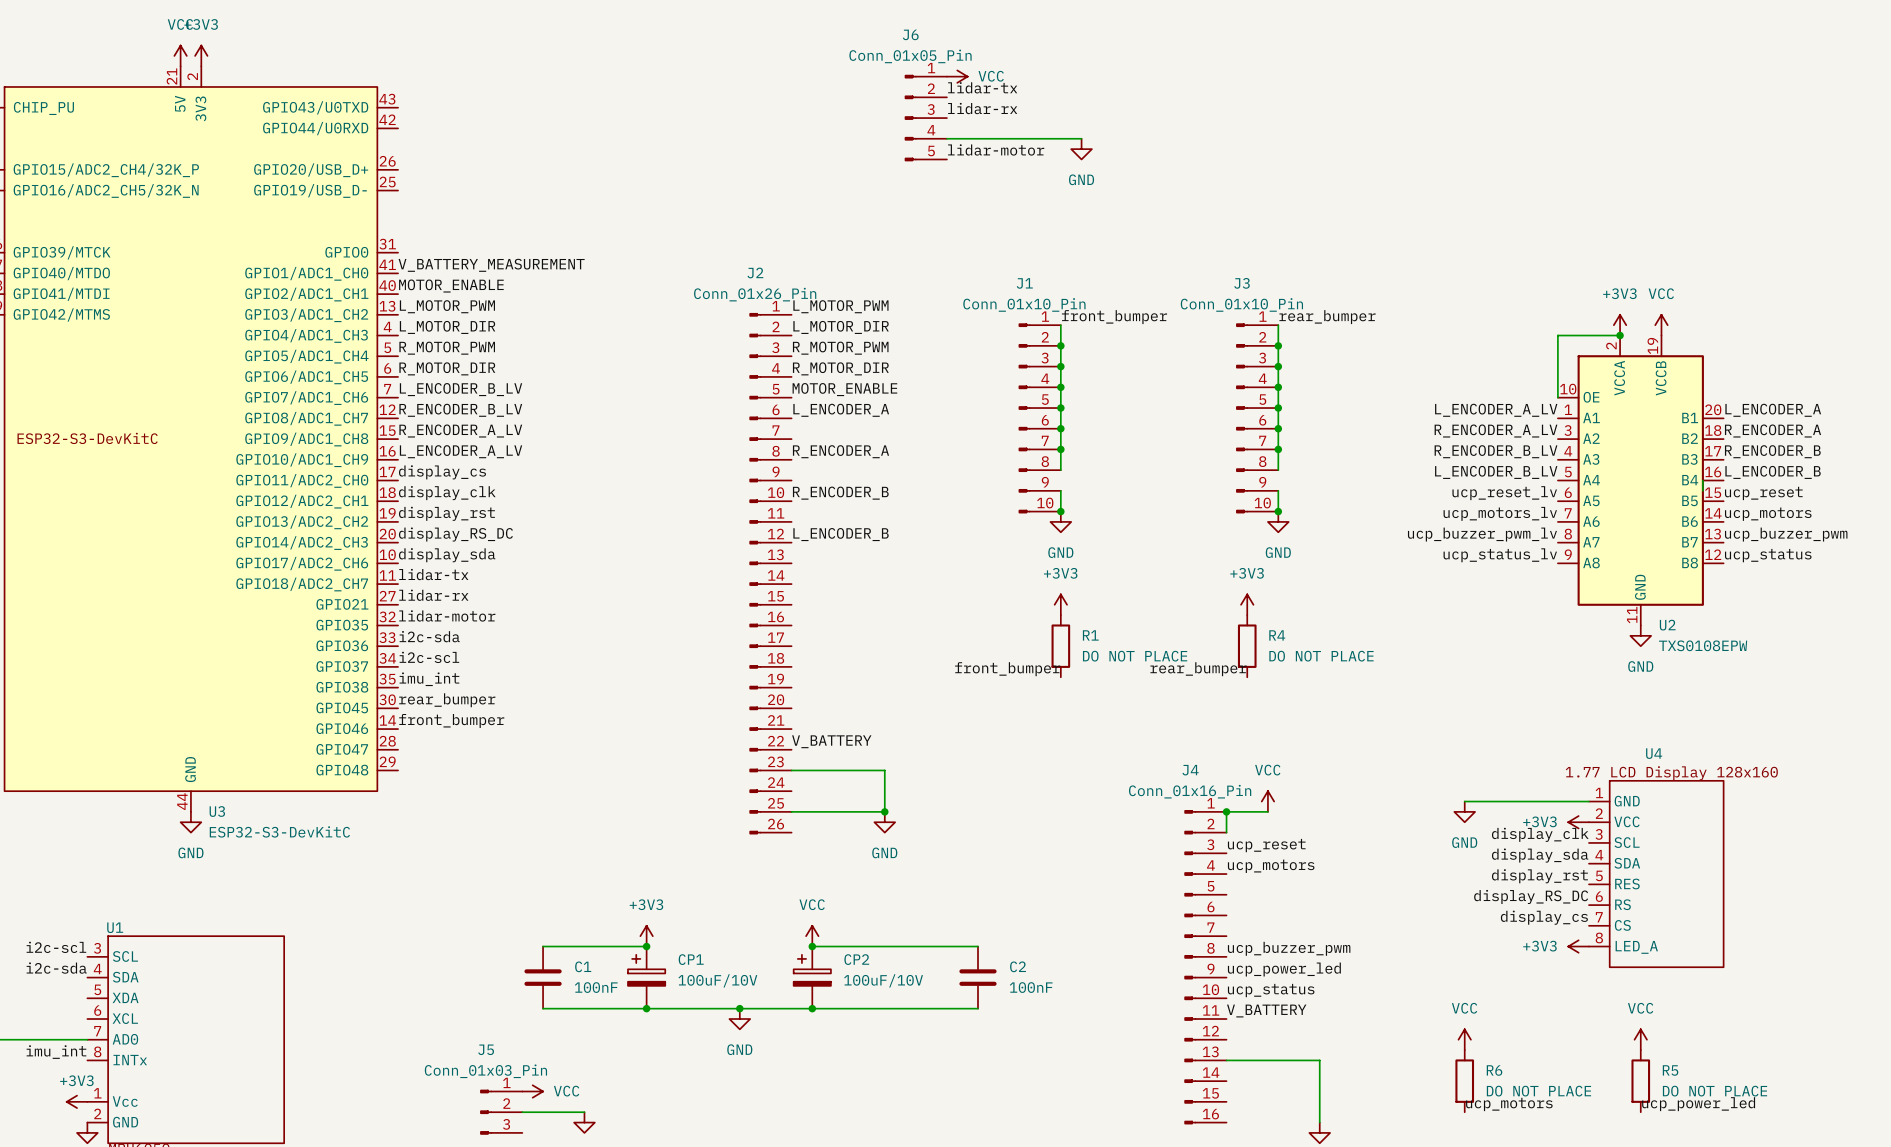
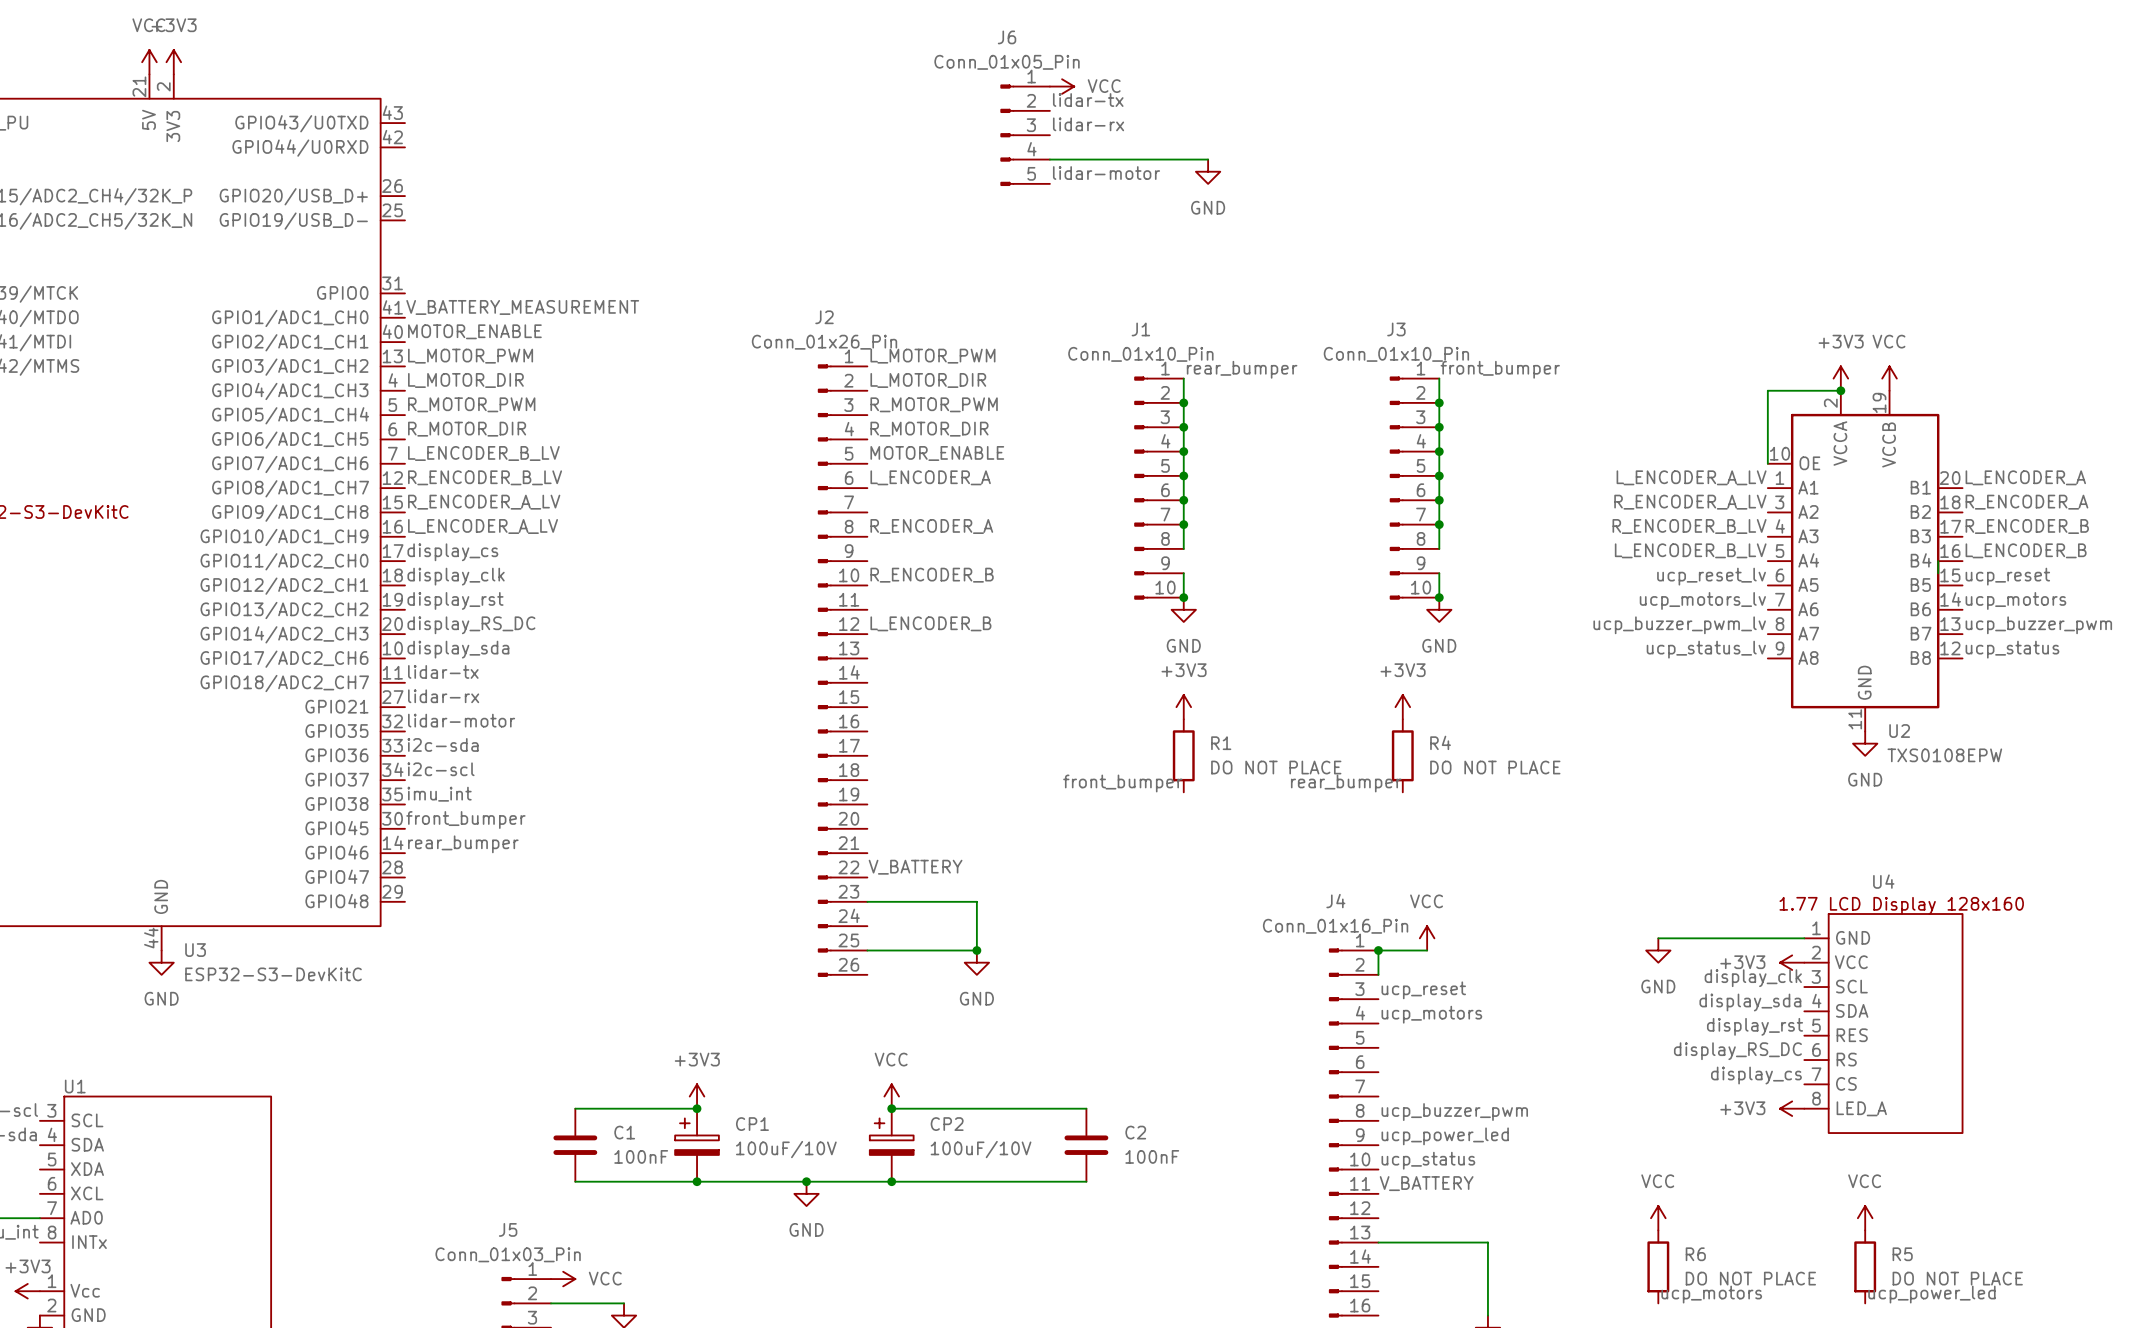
label: front_bumper (1114, 317) -> rear_bumper (1242, 369)
label: rear_bumper (1327, 317) -> front_bumper (1500, 369)
label: rear_bumper (447, 700) -> front_bumper (465, 819)
label: front_bumper (451, 720) -> rear_bumper (463, 844)

